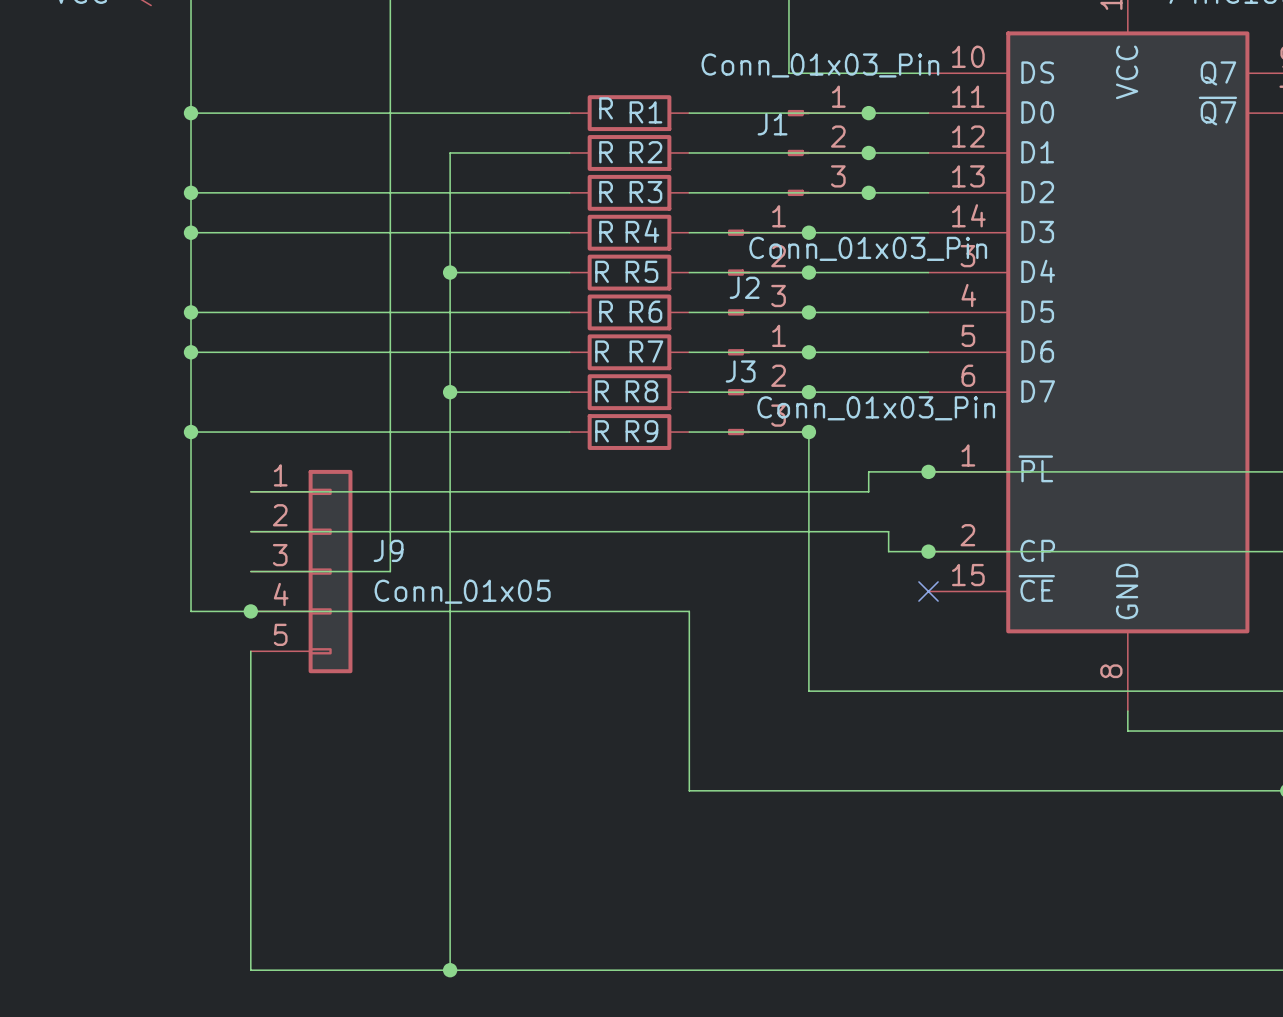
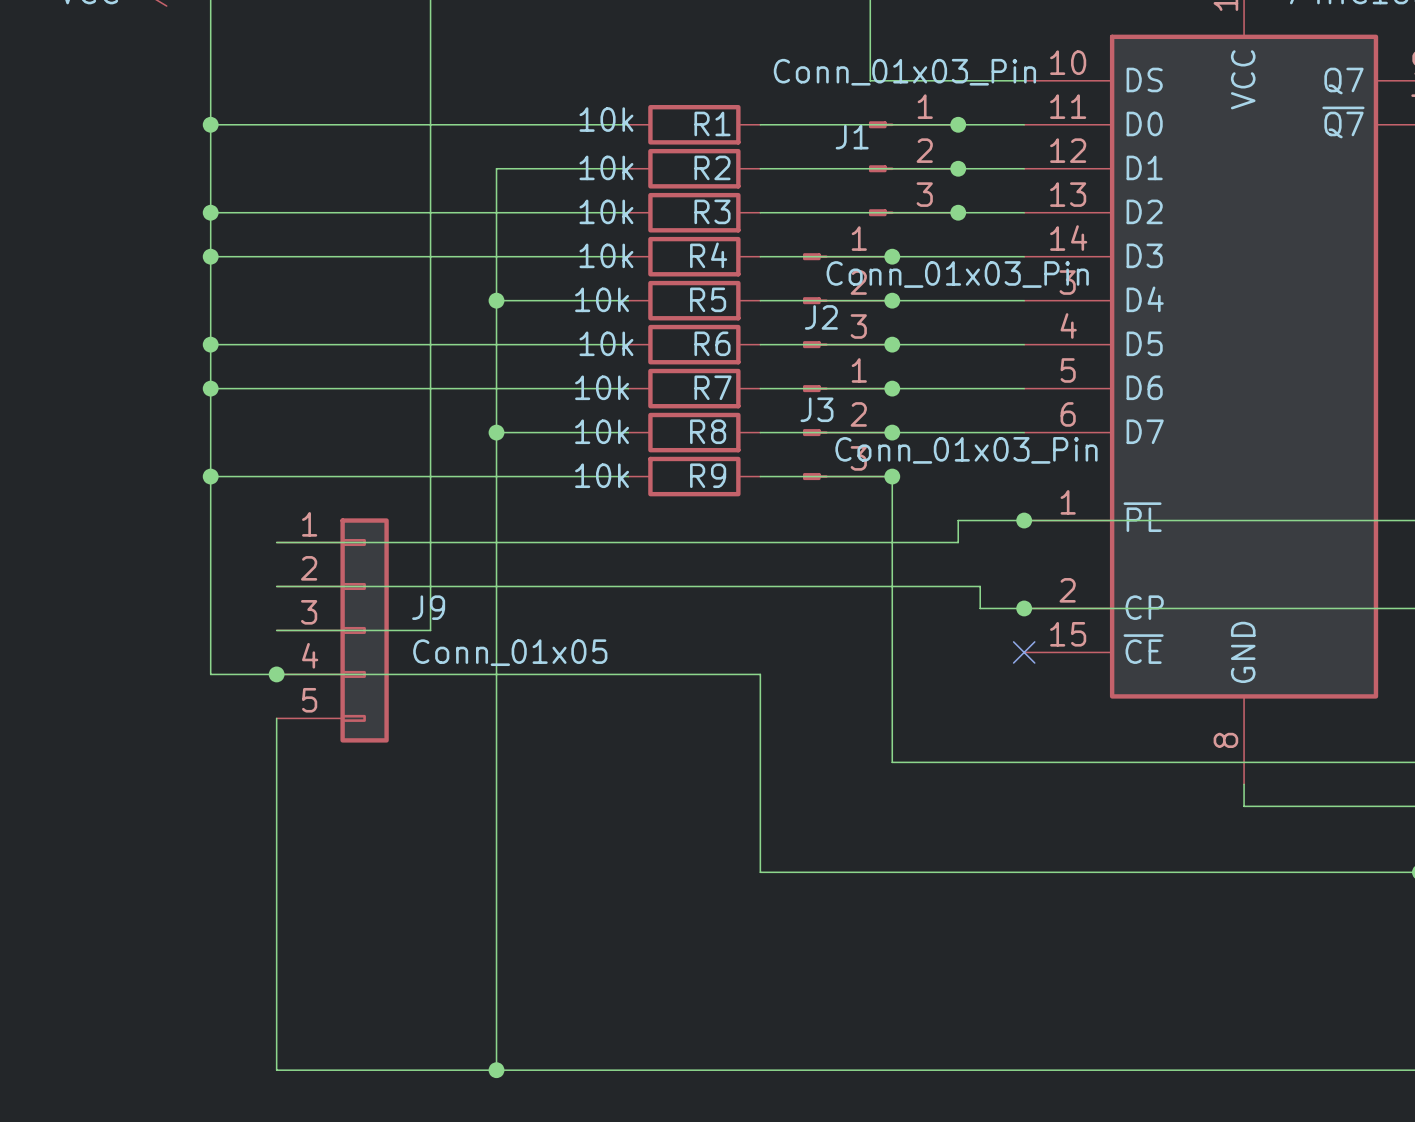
R1 value: R (606, 108) -> 10k (606, 119)
R2 value: R (606, 152) -> 10k (606, 167)
R3 value: R (606, 192) -> 10k (606, 211)
R4 value: R (606, 231) -> 10k (606, 255)
R5 value: R (602, 271) -> 10k (602, 299)
R6 value: R (606, 311) -> 10k (606, 343)
R7 value: R (602, 351) -> 10k (602, 387)
R8 value: R (602, 391) -> 10k (602, 431)
R9 value: R (602, 431) -> 10k (602, 475)

